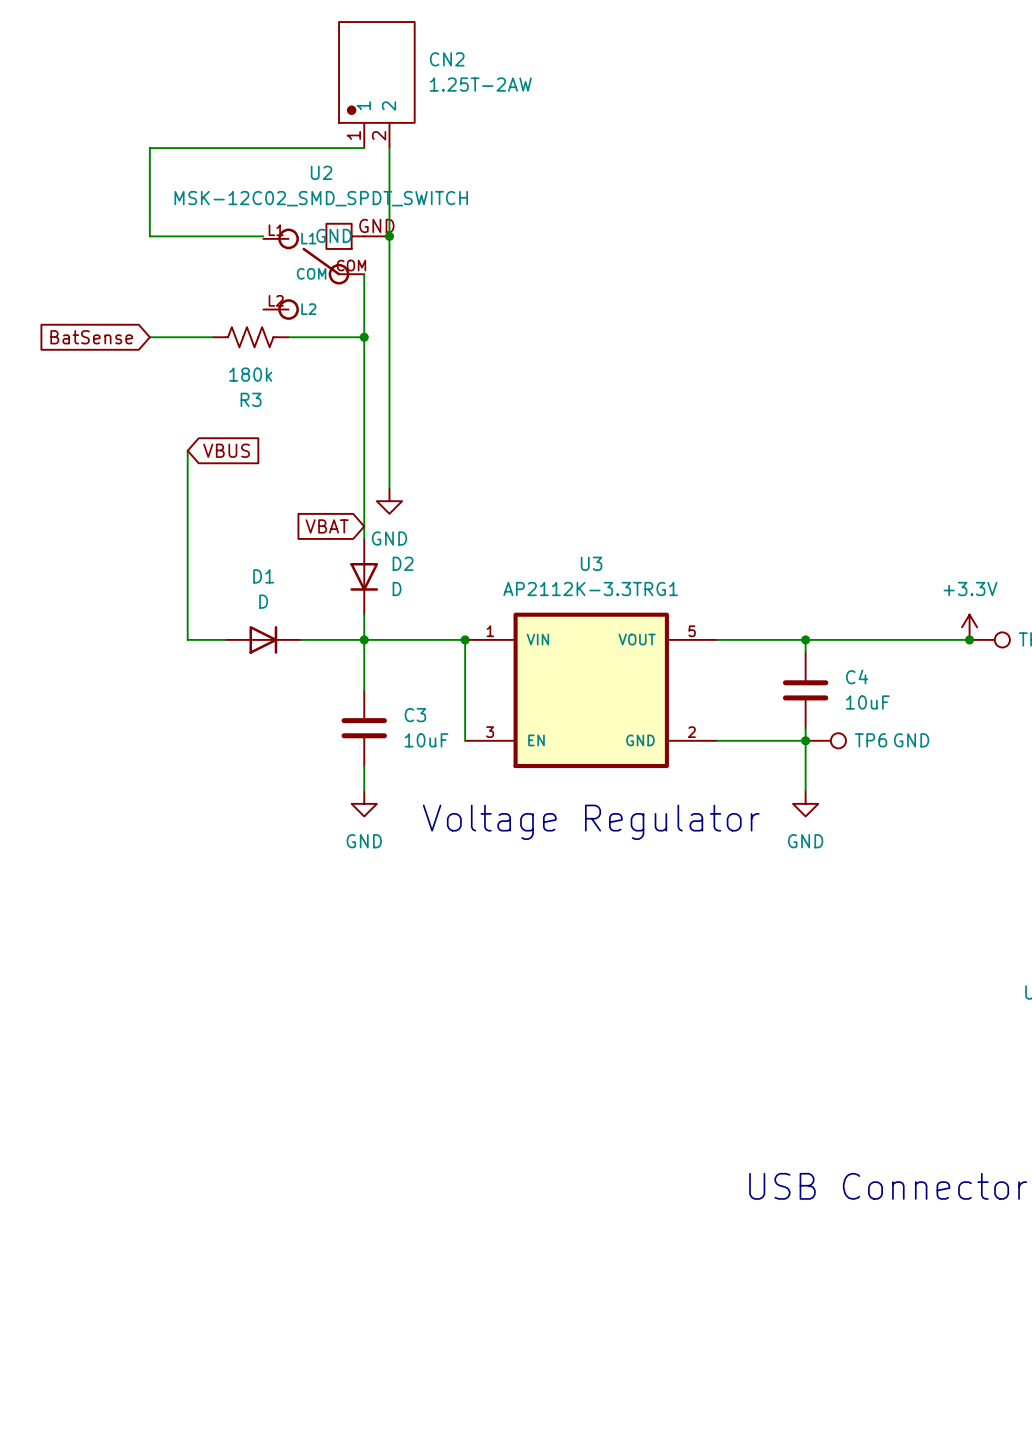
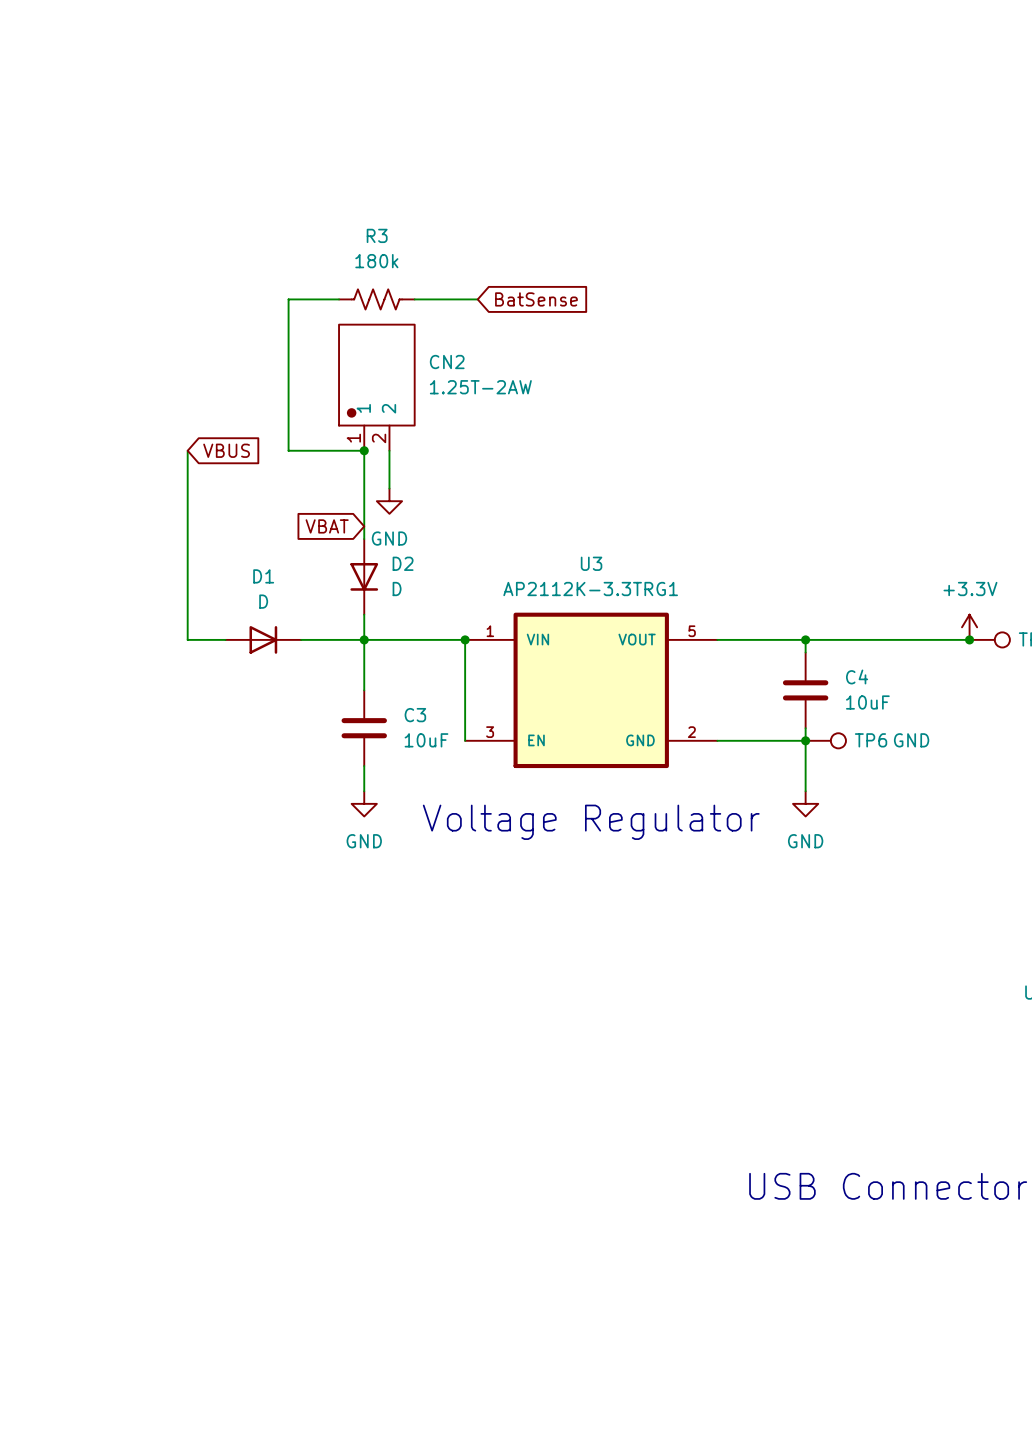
CN2 position: (376, 84) -> (376, 387)
wire: (364, 148) (149, 148) (149, 236) (263, 236) -> none
wire: (389, 148) (389, 450) -> none
junction: (389, 236) -> none
U2: MSK-12C02_SMD_SPDT_SWITCH (326, 271) -> none
wire: (364, 274) (364, 450) -> (339, 299) (288, 299) (288, 450) (364, 450)
wire: none -> (414, 299) (477, 299)
global label: none -> BatSense (536, 299)
global label: BatSense (91, 337) -> none
wire: (149, 337) (212, 337) -> none
R3 position: (250, 337) -> (376, 299)
wire: (288, 337) (364, 337) -> none
junction: (364, 337) -> none
R3 value position: 180k (250, 374) -> 180k (376, 261)
R3 name position: R3 (251, 399) -> R3 (377, 235)
junction: none -> (364, 450)

